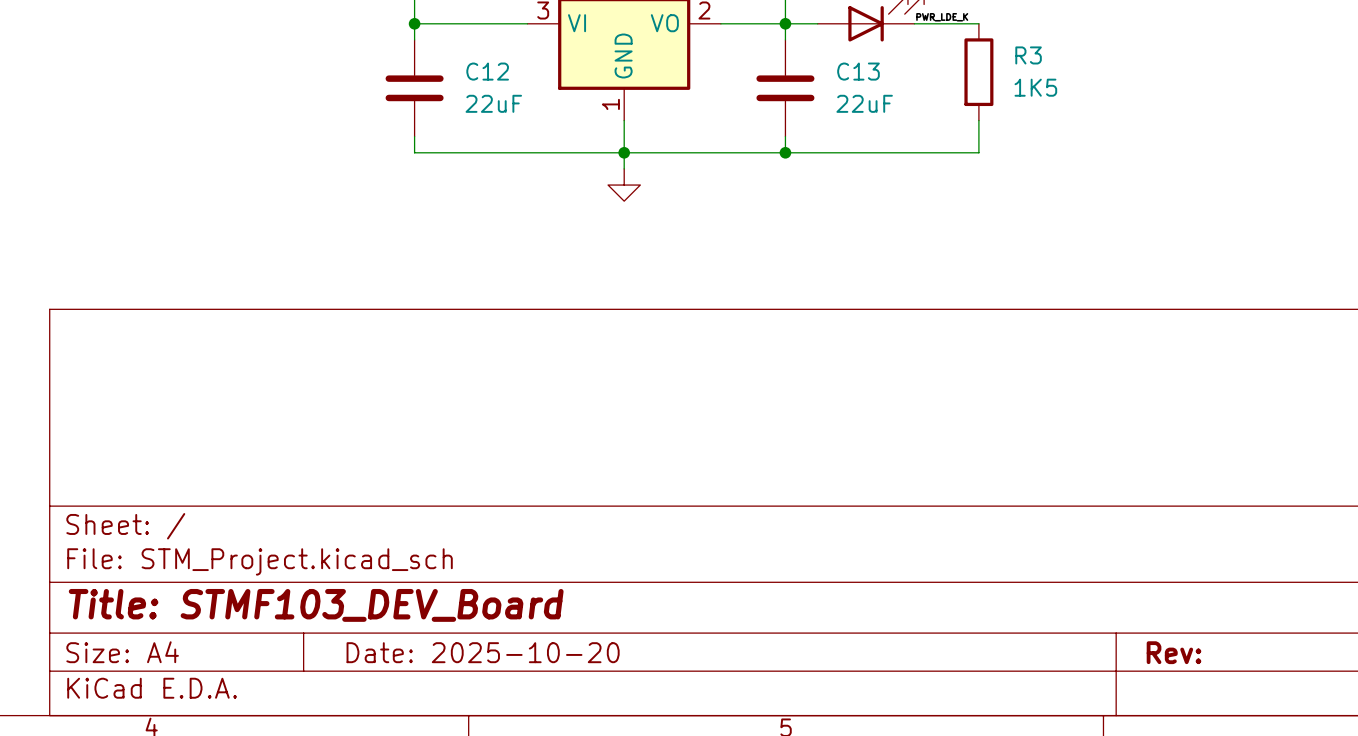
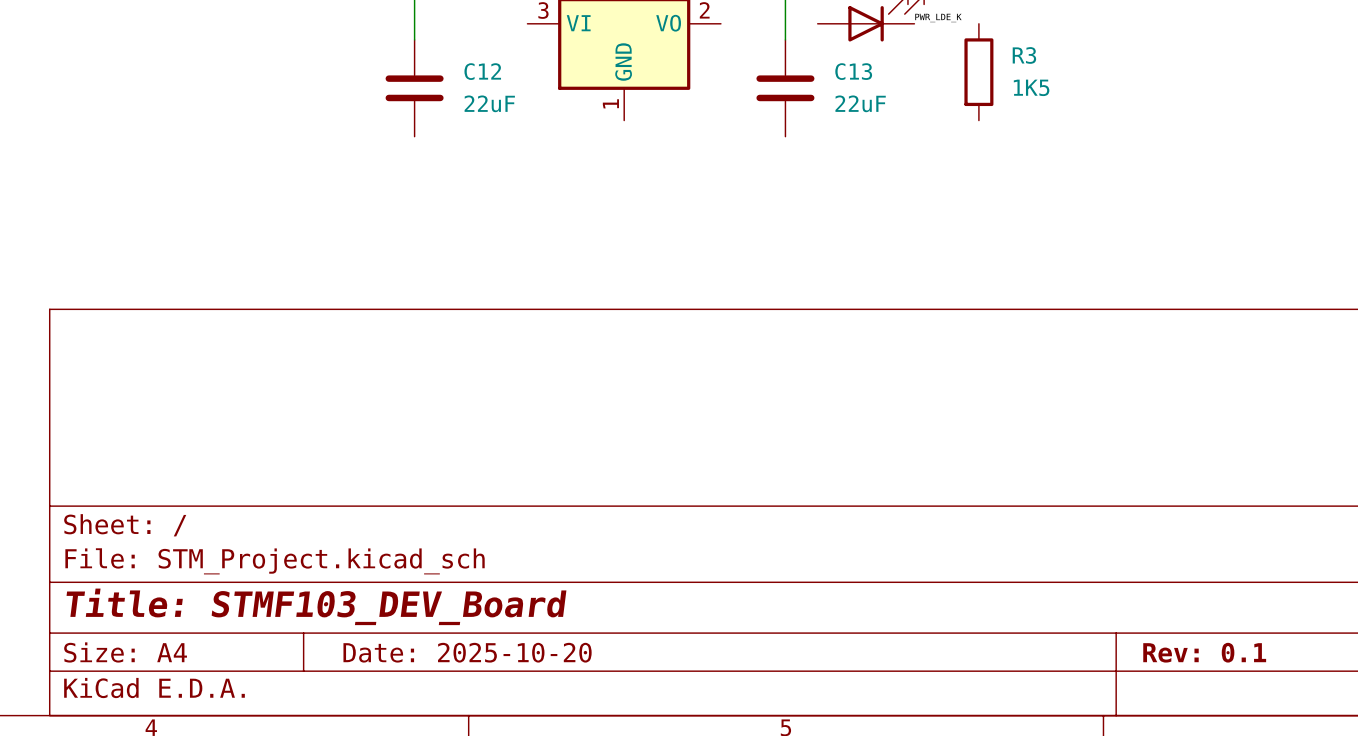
wire: (414, 23) (527, 23) -> none
junction: (414, 23) -> none
wire: (720, 23) (817, 23) -> none
junction: (785, 23) -> none
wire: (914, 23) (978, 23) -> none
wire: (624, 120) (624, 168) -> none
wire: (978, 120) (978, 152) (414, 152) (414, 136) -> none
wire: (785, 136) (785, 152) -> none
junction: (624, 152) -> none
junction: (785, 152) -> none
power symbol: (624, 185) -> none
title block: Rev: (1173, 652) -> Rev: 0.1 (1204, 652)

